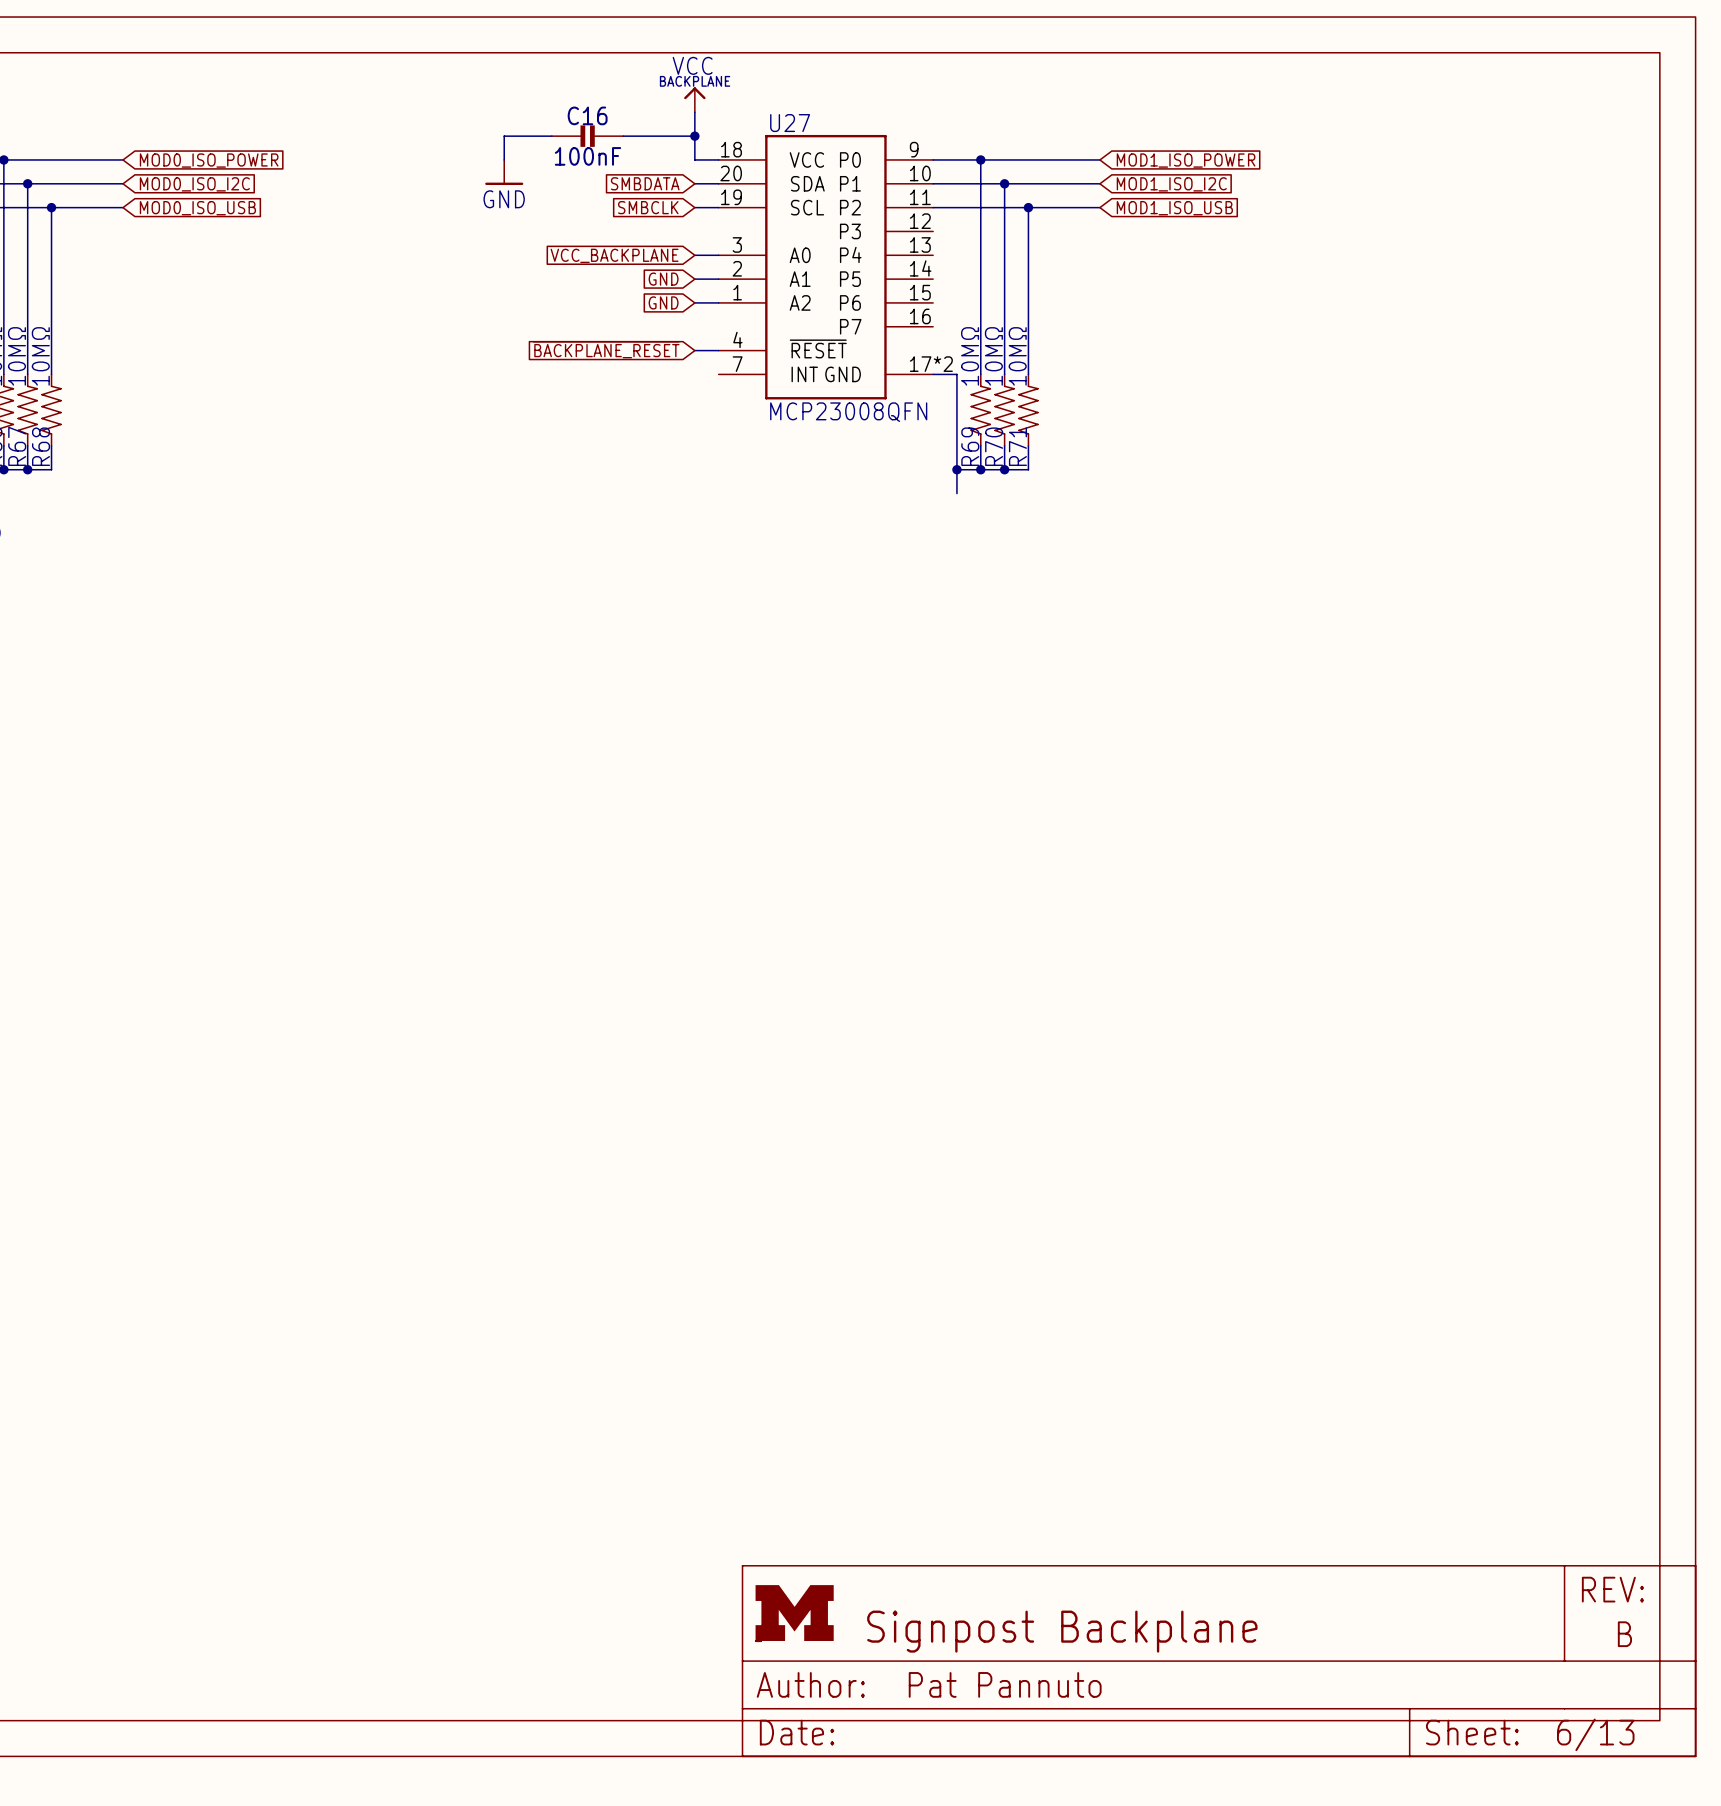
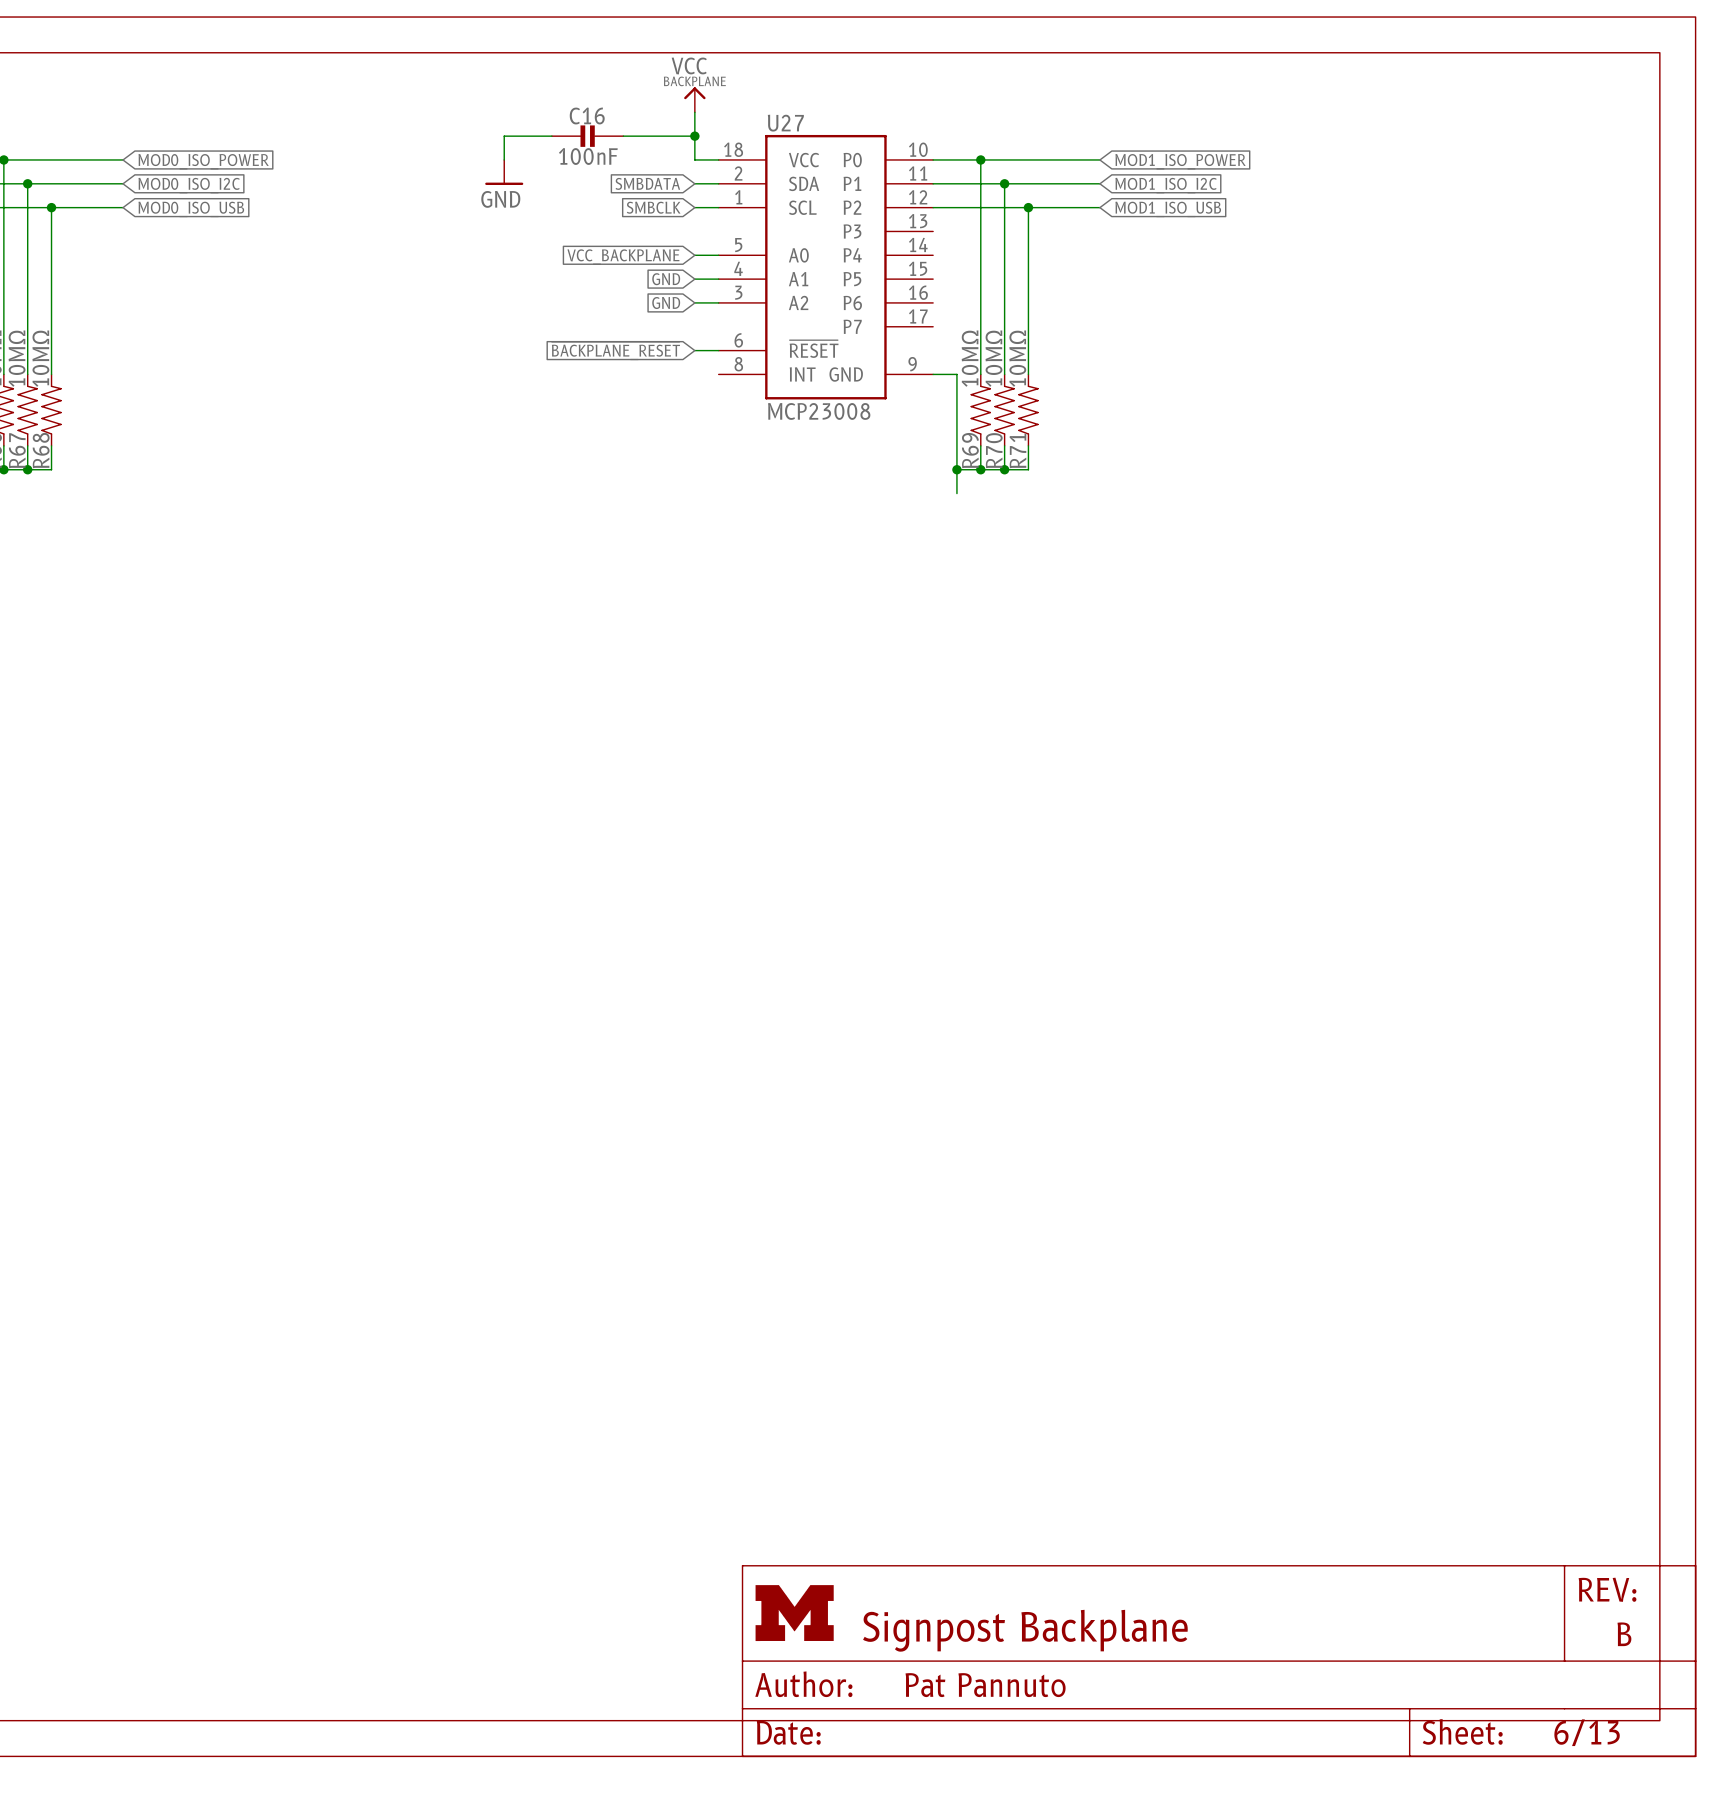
U27 symbol: [718, 134, 934, 400] -> [718, 134, 934, 400]
U27 value: MCP23008QFN (848, 412) -> MCP23008 (819, 411)

